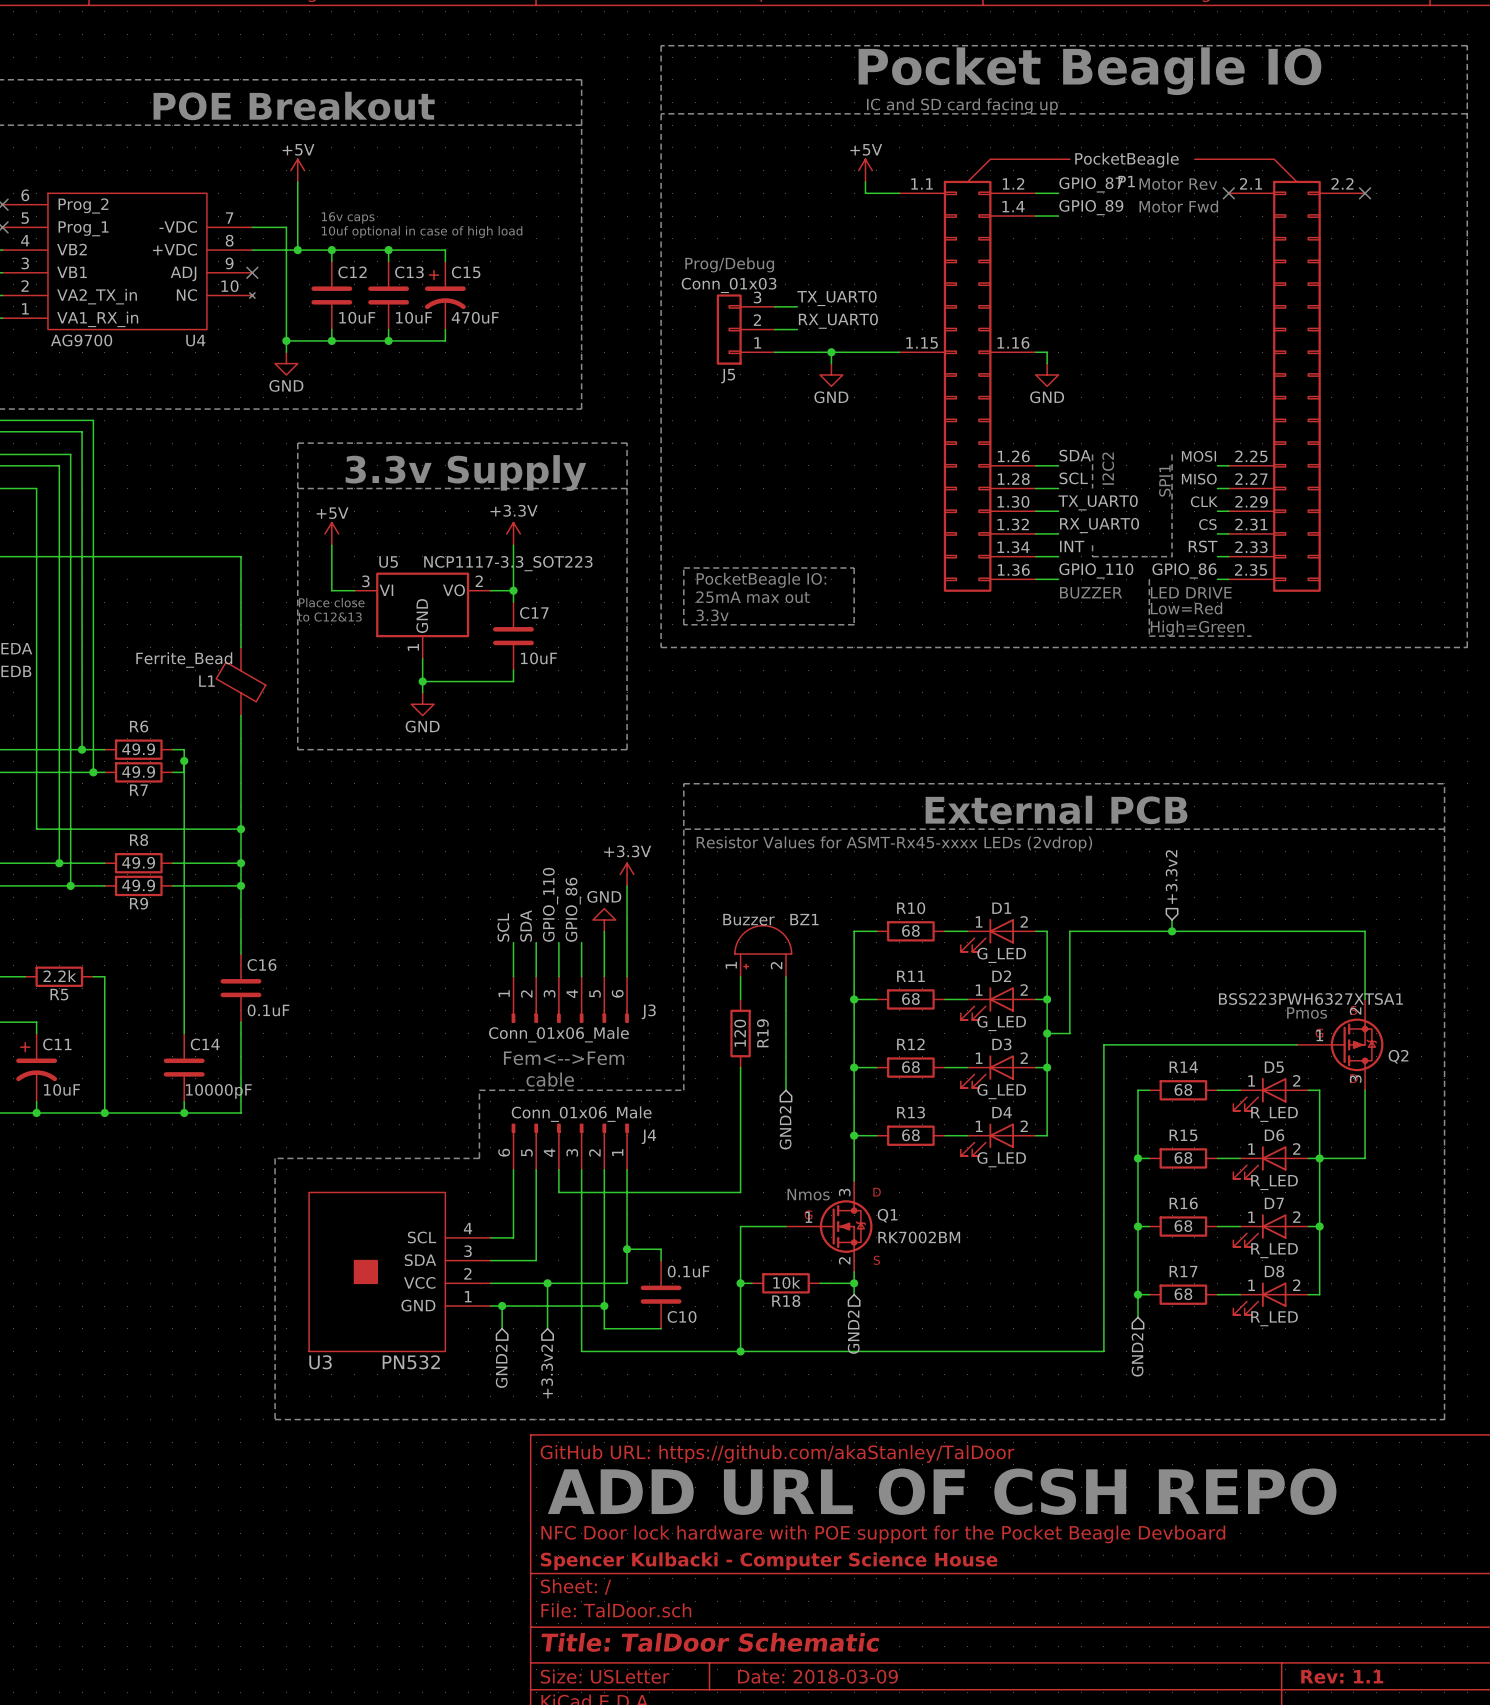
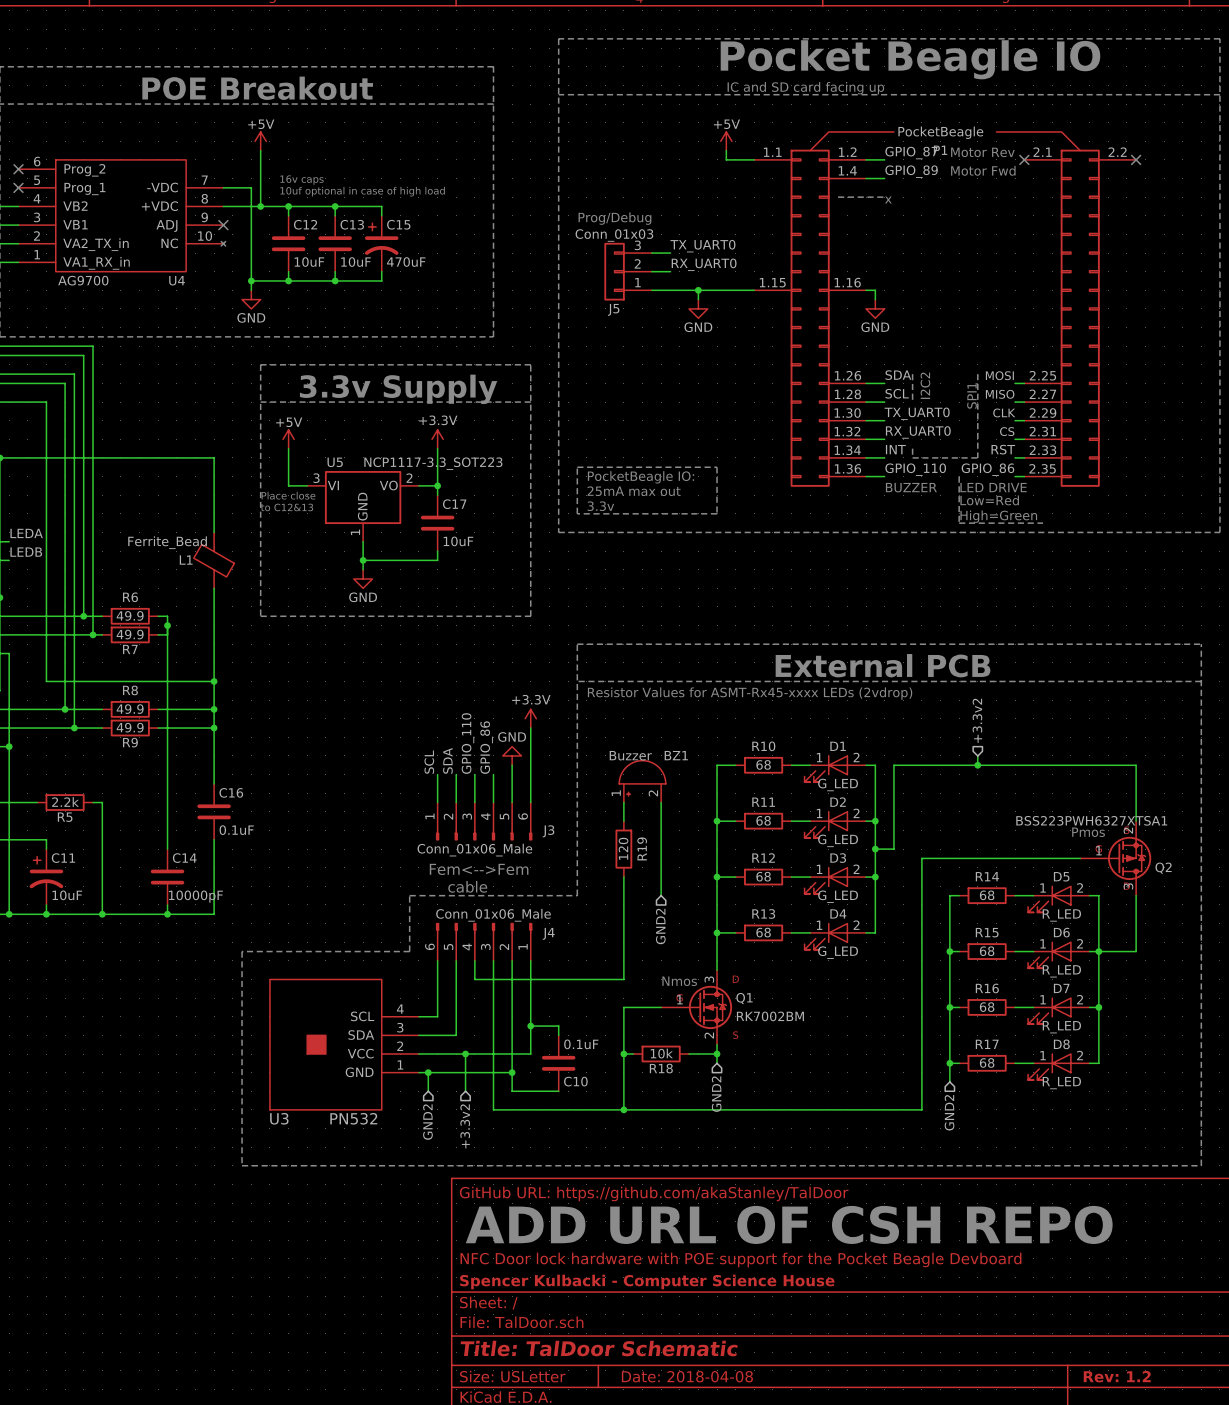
line: none -> (838, 197) (884, 197)
text: none -> x (888, 200)
title block: Date: 2018-03-09 (817, 1676) -> Date: 2018-04-08 (687, 1376)
title block: Rev: 1.1 (1342, 1676) -> Rev: 1.2 (1117, 1376)

